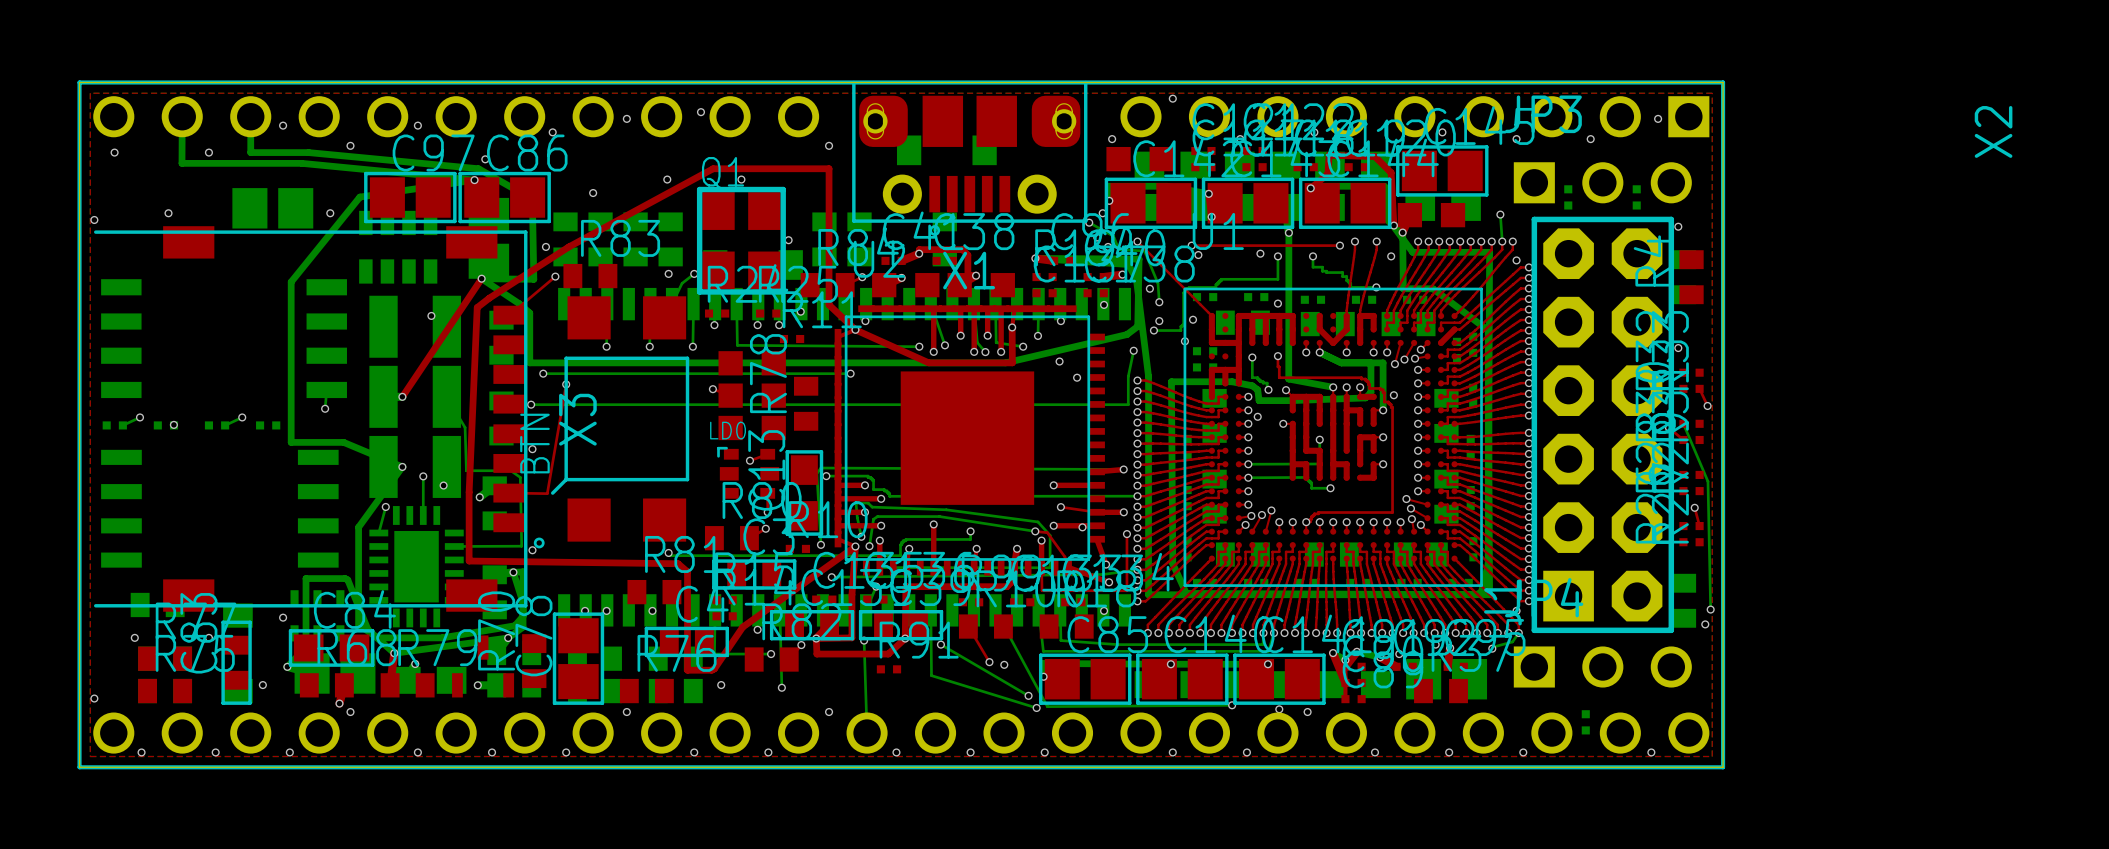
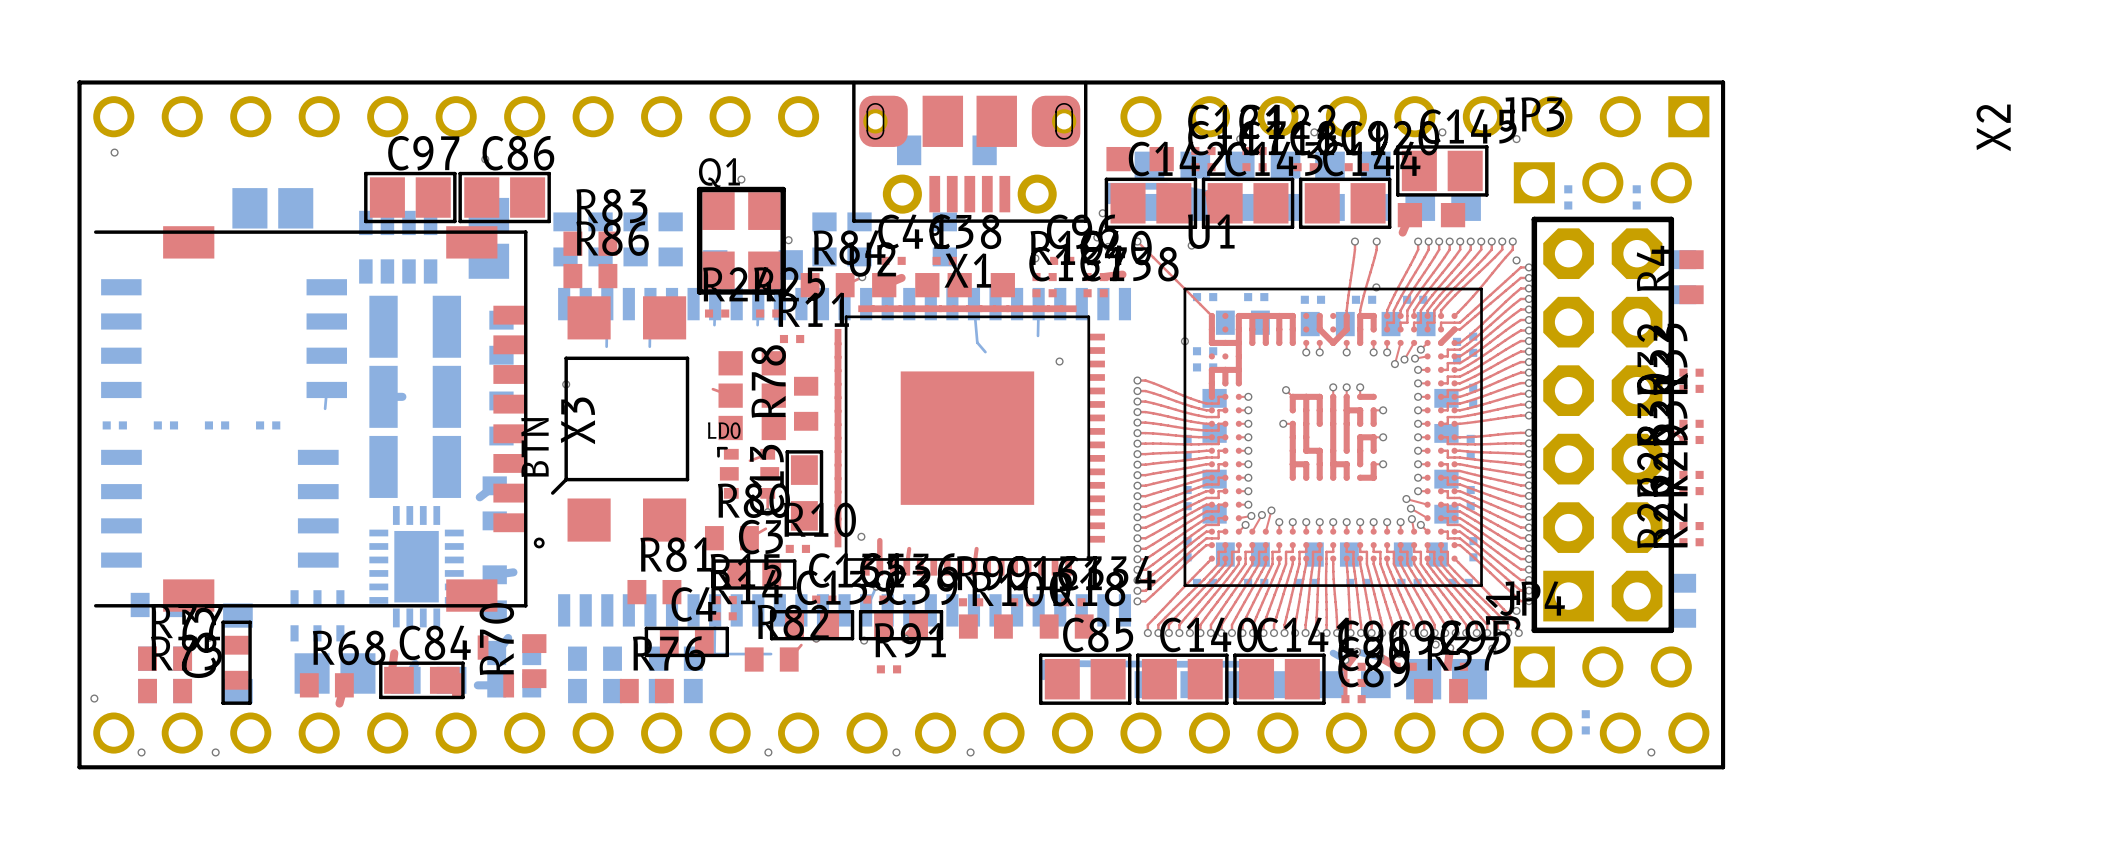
top zone outline: (90, 93) (1712, 93) (1712, 756) (90, 756) (90, 93) -> none
via: (1172, 98) -> none
via: (700, 112) -> none
bottom track: (182, 116) (181, 163) (301, 163) (474, 180) (359, 197) (291, 281) (291, 442) (343, 442) (402, 466) -> none
bottom track: (250, 116) (250, 152) (308, 152) (478, 168) (519, 191) (532, 205) (533, 279) (481, 278) -> none
via: (626, 118) -> none
via: (1658, 118) -> none
via: (283, 125) -> none
via: (417, 125) -> none
via: (552, 132) -> none
via: (1112, 139) -> none
via: (1590, 139) -> none
via: (350, 145) -> none
via: (829, 145) -> none
via: (208, 152) -> none
via: (667, 179) -> none
via: (474, 180) -> none
bottom track: (1310, 188) (1311, 186) (1384, 186) (1385, 215) (1412, 252) (1489, 252) (1488, 563) (1481, 592) (1476, 594) (1148, 594) (1148, 376) (1136, 279) (1128, 264) (1035, 258) (1139, 259) (1137, 326) (1126, 334) (1005, 362) (529, 362) (529, 313) (481, 278) -> none
via: (1310, 188) -> none
via: (593, 193) -> none
via: (1208, 193) -> none
via: (1109, 200) -> none
top track: (1322, 203) (1310, 188) (1327, 174) (1329, 155) (1375, 156) (1391, 172) (1393, 225) -> none
bottom track: (1285, 207) (1288, 232) (1288, 379) (1333, 387) -> none
bottom track: (1375, 207) (1402, 232) (1403, 288) (1432, 288) (1488, 330) (1489, 594) (1186, 593) (1172, 563) (1171, 381) (1232, 381) (1252, 385) (1257, 389) (1259, 400) (1365, 397) (1370, 392) (1370, 362) -> none
via: (168, 213) -> none
via: (330, 213) -> none
bottom track: (1500, 214) (1502, 241) -> none
via: (1500, 214) -> none
via: (1211, 216) -> none
via: (94, 219) -> none
bottom track: (1089, 222) (1113, 236) (1118, 249) (1144, 250) (1157, 283) (1159, 302) -> none
via: (1089, 222) -> none
via: (1393, 225) -> none
via: (1678, 226) -> none
via: (1288, 232) -> none
via: (1402, 232) -> none
R83 name: R83 (620, 238) -> R86 (612, 238)
R83: none -> (590, 243)
top track: (1191, 245) (1339, 245) -> none
via: (1339, 245) -> none
via: (545, 246) -> none
via: (919, 253) -> none
via: (1260, 253) -> none
via: (1198, 255) -> none
bottom track: (1277, 256) (1277, 279) (1221, 279) (1215, 287) (1188, 287) (1183, 292) (1183, 325) (1180, 326) (1180, 330) (1153, 330) -> none
via: (1277, 256) -> none
bottom track: (1312, 256) (1312, 267) (1322, 267) (1322, 271) (1326, 272) (1342, 272) (1342, 276) (1346, 276) (1350, 287) (1376, 287) -> none
via: (1312, 256) -> none
via: (1391, 256) -> none
top track: (1035, 258) (1054, 260) -> none
top track: (901, 260) (919, 253) (919, 249) (962, 249) (967, 255) (967, 275) (976, 275) (959, 285) -> none
via: (668, 273) -> none
bottom track: (694, 273) (682, 283) (672, 304) -> none
via: (694, 273) -> none
via: (1122, 274) -> none
via: (976, 275) -> none
top track: (555, 276) (509, 315) -> none
via: (555, 276) -> none
via: (901, 277) -> none
top track: (481, 278) (402, 396) -> none
via: (481, 278) -> none
via: (1149, 288) -> none
via: (1159, 302) -> none
via: (1277, 303) -> none
bottom track: (693, 304) (692, 346) -> none
bottom track: (736, 304) (737, 345) (919, 346) -> none
bottom track: (930, 304) (944, 345) -> none
bottom track: (995, 304) (996, 342) (1023, 346) -> none
via: (1104, 304) -> none
top track: (933, 308) (933, 351) -> none
top track: (960, 308) (960, 335) -> none
top track: (974, 308) (974, 351) -> none
top track: (987, 308) (987, 335) -> none
top track: (1001, 308) (1001, 351) -> none
top track: (1014, 308) (1012, 327) (1012, 362) (928, 362) (855, 329) -> none
via: (800, 311) -> none
via: (431, 315) -> none
via: (1193, 319) -> none
via: (865, 321) -> none
via: (1060, 321) -> none
via: (1159, 321) -> none
via: (714, 325) -> none
via: (757, 325) -> none
via: (779, 325) -> none
via: (1012, 327) -> none
top track: (855, 329) (829, 304) (829, 168) (713, 168) (568, 246) (477, 307) (469, 492) (469, 561) (678, 563) (687, 571) (687, 670) (711, 670) (742, 627) (855, 546) -> none
top track: (855, 329) (838, 337) -> none
via: (855, 329) -> none
via: (1153, 330) -> none
via: (960, 335) -> none
via: (987, 335) -> none
via: (1037, 335) -> none
via: (944, 345) -> none
via: (606, 346) -> none
via: (649, 346) -> none
via: (692, 346) -> none
via: (919, 346) -> none
via: (1023, 346) -> none
via: (1678, 348) -> none
bottom track: (1133, 350) (1128, 376) (1128, 404) (531, 404) -> none
via: (1133, 350) -> none
via: (933, 351) -> none
via: (974, 351) -> none
via: (1001, 351) -> none
via: (985, 352) -> none
bottom track: (1319, 352) (1341, 362) (1383, 362) (1383, 410) -> none
top track: (1277, 356) (1279, 377) (1361, 377) (1368, 381) (1369, 388) (1383, 389) (1384, 401) (1388, 401) (1392, 407) (1392, 512) (1318, 512) (1311, 516) (1310, 521) (1306, 522) -> none
via: (1277, 356) -> none
bottom track: (1252, 357) (1252, 377) (1257, 377) (1260, 381) (1267, 383) (1268, 389) -> none
via: (1252, 357) -> none
bottom track: (543, 373) (850, 373) -> none
via: (543, 373) -> none
via: (850, 373) -> none
via: (1077, 377) -> none
top track: (566, 384) (547, 493) (509, 493) -> none
top track: (1699, 388) (1707, 405) -> none
via: (712, 389) -> none
via: (1268, 389) -> none
via: (1393, 395) -> none
via: (402, 396) -> none
bottom track: (446, 396) (465, 427) (466, 470) (510, 470) (520, 477) (521, 546) (454, 546) -> none
via: (531, 404) -> none
via: (1707, 405) -> none
via: (325, 408) -> none
via: (1257, 416) -> none
bottom track: (139, 417) (122, 425) -> none
via: (139, 417) -> none
bottom track: (242, 417) (225, 425) -> none
via: (242, 417) -> none
bottom track: (1683, 423) (1707, 481) (1710, 609) -> none
via: (173, 424) -> none
bottom track: (1319, 439) (1319, 463) (1248, 464) -> none
via: (1319, 439) -> none
via: (532, 449) -> none
via: (749, 460) -> none
bottom track: (402, 466) (358, 527) (358, 628) (363, 628) (377, 637) (442, 637) (514, 625) (523, 616) -> none
via: (402, 466) -> none
bottom track: (1123, 469) (820, 468) (816, 473) (820, 544) -> none
top track: (1123, 469) (1096, 471) -> none
via: (1123, 469) -> none
bottom track: (423, 476) (423, 515) -> none
via: (423, 476) -> none
bottom track: (826, 476) (868, 476) (873, 480) (873, 489) (884, 489) (889, 493) (889, 496) (1137, 496) -> none
via: (826, 476) -> none
bottom track: (1248, 477) (1306, 477) (1311, 482) (1311, 488) (1330, 488) -> none
via: (443, 485) -> none
top track: (838, 485) (864, 485) -> none
via: (864, 485) -> none
top track: (1053, 485) (1096, 485) -> none
via: (1053, 485) -> none
via: (1330, 488) -> none
via: (479, 497) -> none
top track: (838, 498) (881, 498) -> none
via: (881, 498) -> none
bottom track: (385, 506) (378, 533) -> none
via: (385, 506) -> none
top track: (1060, 507) (1096, 512) (1123, 512) -> none
via: (1060, 507) -> none
top track: (1694, 507) (1699, 526) -> none
via: (1694, 507) -> none
top track: (838, 512) (864, 512) -> none
via: (864, 512) -> none
via: (1123, 512) -> none
top track: (933, 524) (933, 567) -> none
via: (933, 524) -> none
top track: (838, 525) (881, 525) -> none
via: (881, 525) -> none
top track: (1053, 525) (1096, 525) (1082, 527) -> none
via: (1053, 525) -> none
via: (1082, 527) -> none
via: (765, 528) -> none
bottom track: (970, 531) (970, 539) (905, 539) (900, 544) (900, 555) (668, 555) (668, 552) -> none
via: (970, 531) -> none
bottom track: (1035, 531) (939, 516) (877, 516) (873, 519) (869, 546) -> none
top track: (1035, 531) (1047, 532) (1064, 557) (1068, 567) (1109, 582) -> none
via: (1035, 531) -> none
top track: (1126, 534) (1126, 590) (1042, 590) (1041, 540) -> none
via: (1126, 534) -> none
bottom track: (861, 536) (856, 503) (868, 503) (872, 507) (946, 509) (1037, 521) (1050, 535) (1050, 567) (879, 567) -> none
top track: (838, 539) (855, 546) -> none
top track: (1096, 539) (1106, 564) (1096, 539) -> none
via: (879, 540) -> none
via: (1041, 540) -> none
via: (820, 544) -> none
top track: (855, 546) (851, 594) (851, 637) (816, 638) (816, 654) (888, 654) (905, 638) (905, 586) (1006, 586) (1011, 582) (1017, 548) (1014, 567) -> none
via: (855, 546) -> none
via: (869, 546) -> none
via: (909, 548) -> none
via: (976, 548) -> none
via: (1017, 548) -> none
via: (532, 550) -> none
via: (668, 552) -> none
via: (1106, 564) -> none
bottom track: (1137, 569) (1102, 574) (831, 577) -> none
via: (513, 572) -> none
via: (831, 577) -> none
via: (1109, 582) -> none
bottom track: (523, 602) (513, 572) (523, 571) (523, 627) (508, 638) (394, 653) (368, 629) (347, 579) (306, 578) (306, 647) (287, 666) (312, 673) -> none
via: (1710, 609) -> none
via: (585, 610) -> none
via: (606, 610) -> none
via: (652, 610) -> none
bottom track: (779, 610) (781, 687) -> none
bottom track: (930, 610) (931, 675) (1036, 707) -> none
bottom track: (995, 610) (1047, 706) (1232, 705) -> none
bottom track: (1038, 610) (1043, 651) (1268, 651) (1274, 633) -> none
bottom track: (1060, 610) (1060, 640) (1117, 644) (1263, 644) (1263, 633) -> none
via: (1104, 610) -> none
via: (283, 617) -> none
via: (1705, 624) -> none
top track: (968, 626) (989, 662) -> none
via: (757, 629) -> none
bottom track: (1518, 633) (1512, 641) (1492, 648) -> none
via: (134, 637) -> none
via: (508, 638) -> none
bottom track: (864, 640) (867, 733) -> none
bottom track: (940, 644) (1028, 695) -> none
via: (940, 644) -> none
via: (801, 645) -> none
C84 position: (331, 647) -> (421, 680)
via: (394, 653) -> none
top track: (1333, 653) (1345, 682) -> none
via: (1333, 653) -> none
via: (771, 654) -> none
C78: (578, 658) -> none
via: (989, 662) -> none
via: (415, 664) -> none
via: (1004, 664) -> none
via: (1170, 664) -> none
via: (1268, 664) -> none
via: (287, 666) -> none
via: (1043, 676) -> none
via: (262, 685) -> none
R79: (407, 685) -> none
via: (477, 685) -> none
via: (721, 685) -> none
via: (781, 687) -> none
via: (1028, 695) -> none
via: (339, 703) -> none
via: (1232, 705) -> none
via: (1036, 707) -> none
via: (1279, 709) -> none
via: (350, 712) -> none
via: (626, 712) -> none
via: (829, 712) -> none
via: (1307, 712) -> none
via: (289, 752) -> none
via: (417, 752) -> none
via: (492, 752) -> none
via: (566, 752) -> none
via: (694, 752) -> none
via: (1044, 752) -> none
via: (1172, 752) -> none
via: (1246, 752) -> none
via: (1375, 752) -> none
via: (1449, 752) -> none
via: (1523, 752) -> none

